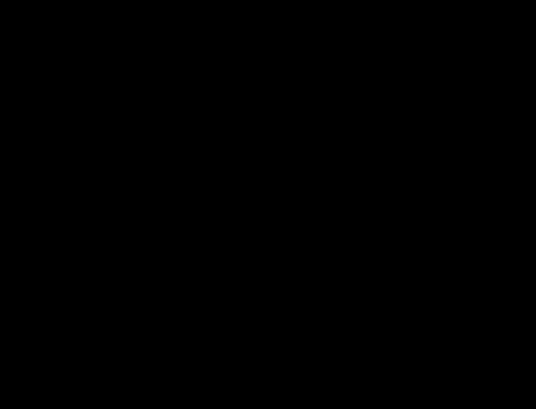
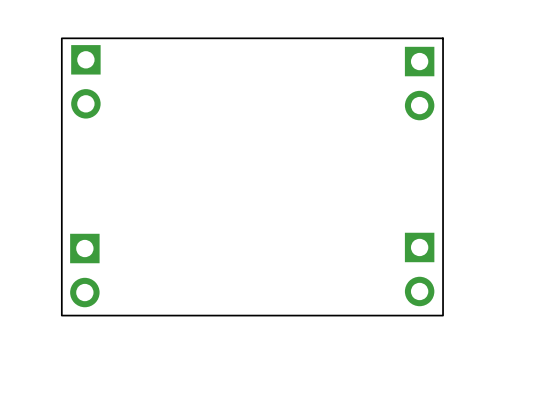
part: none -> (252, 176)

